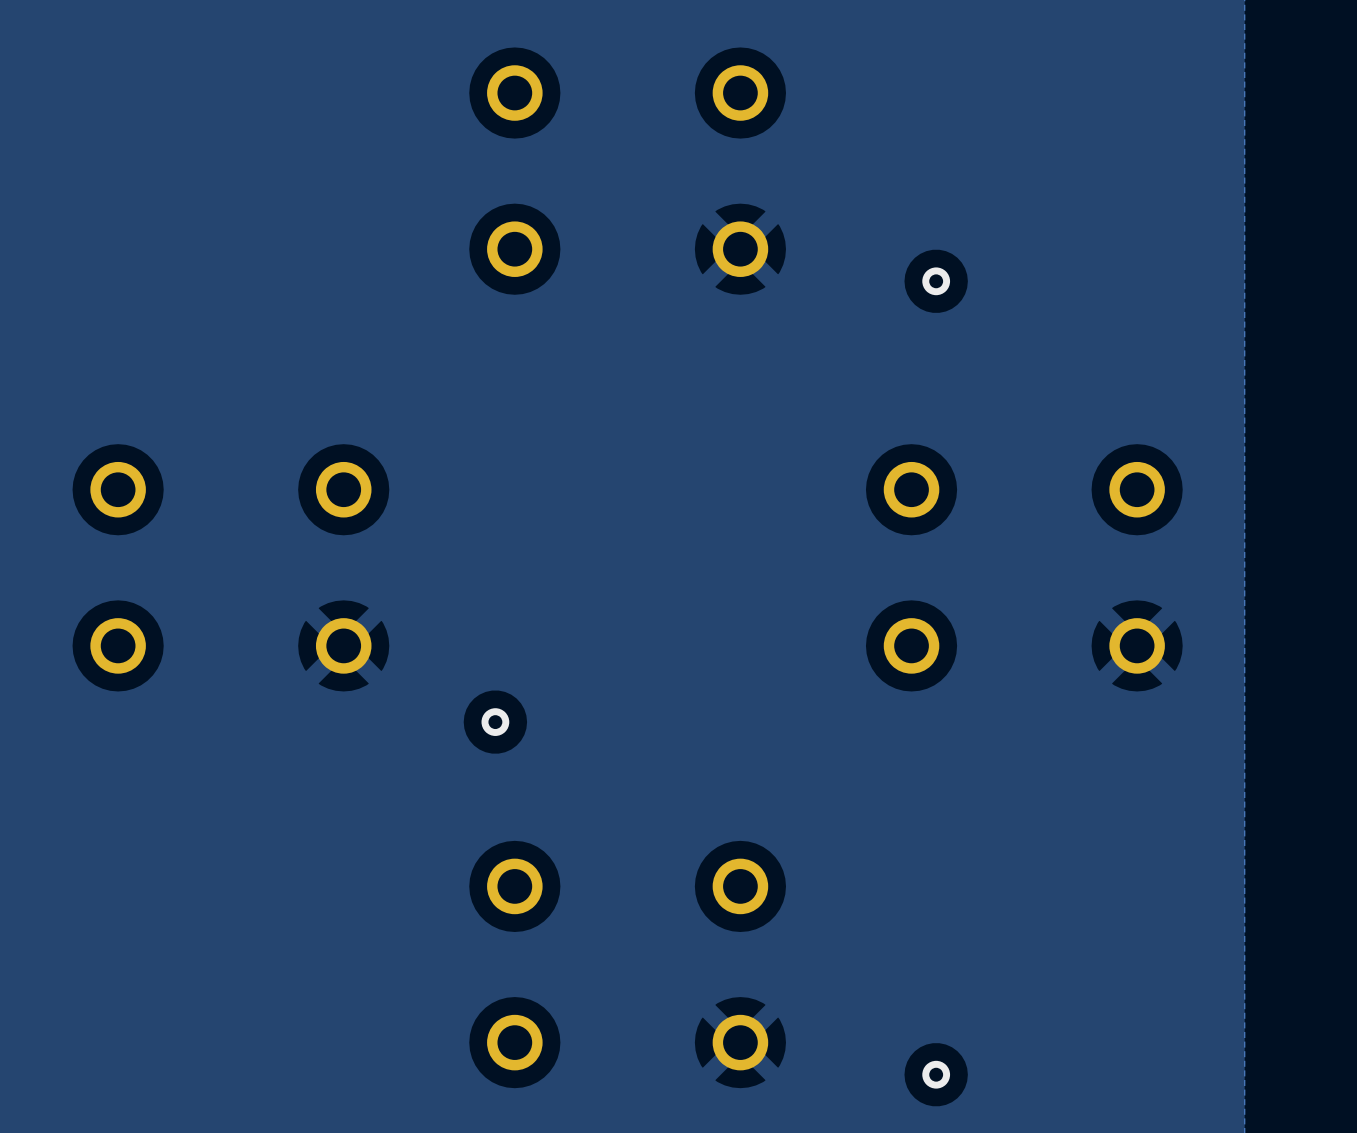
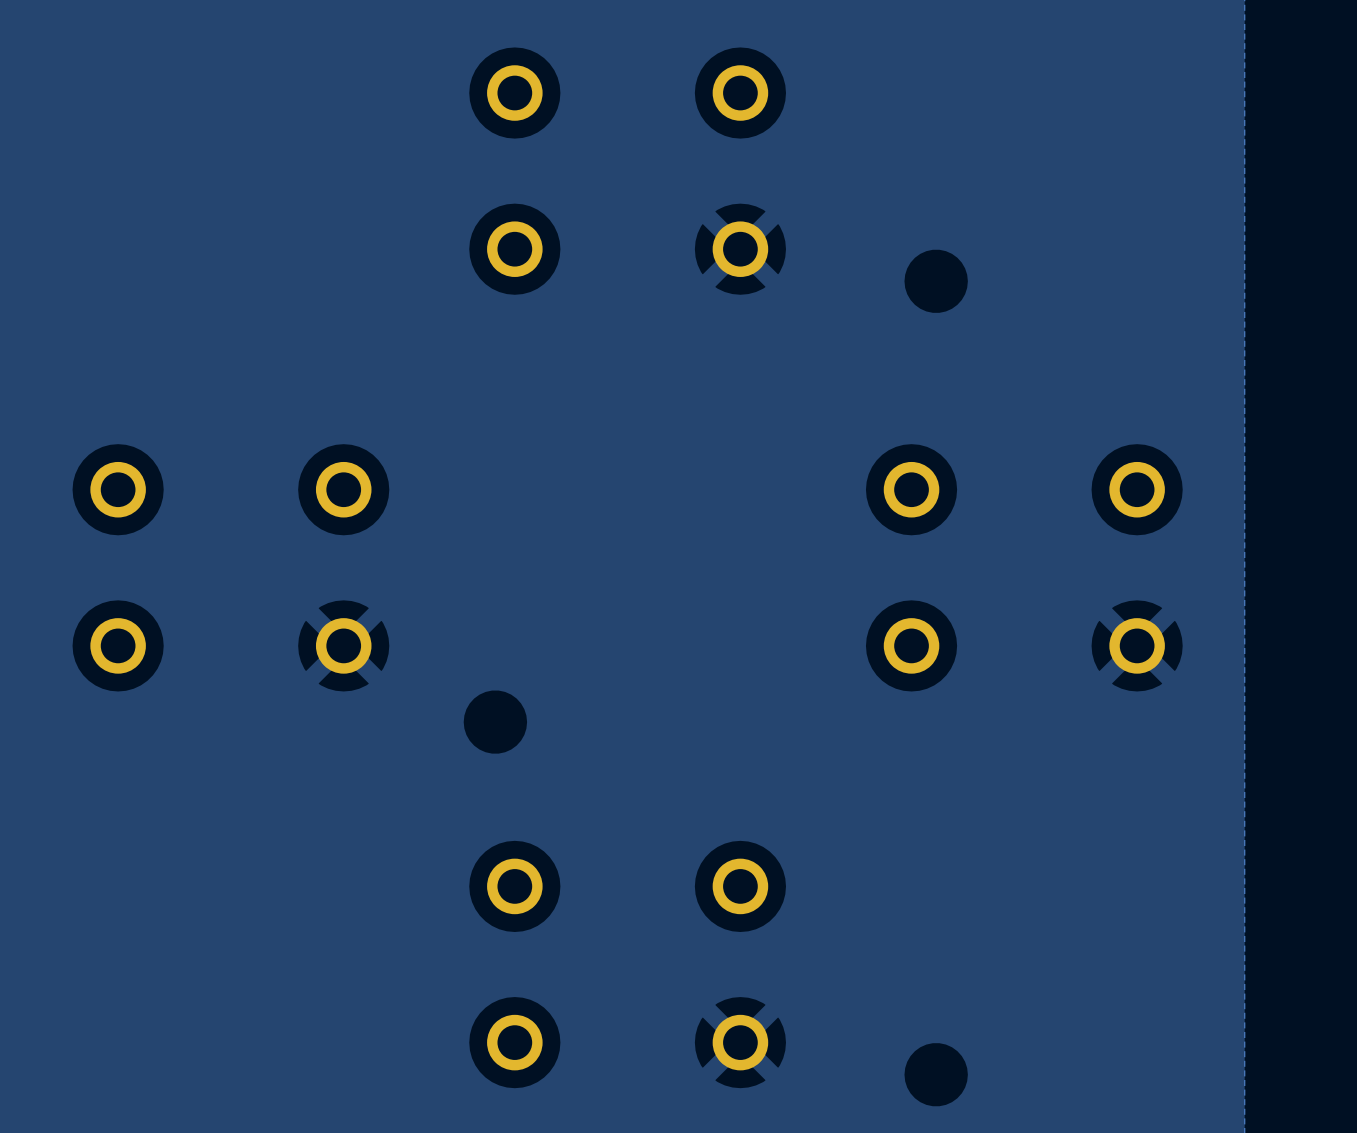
via: (936, 281) -> none
via: (495, 722) -> none
via: (936, 1074) -> none

